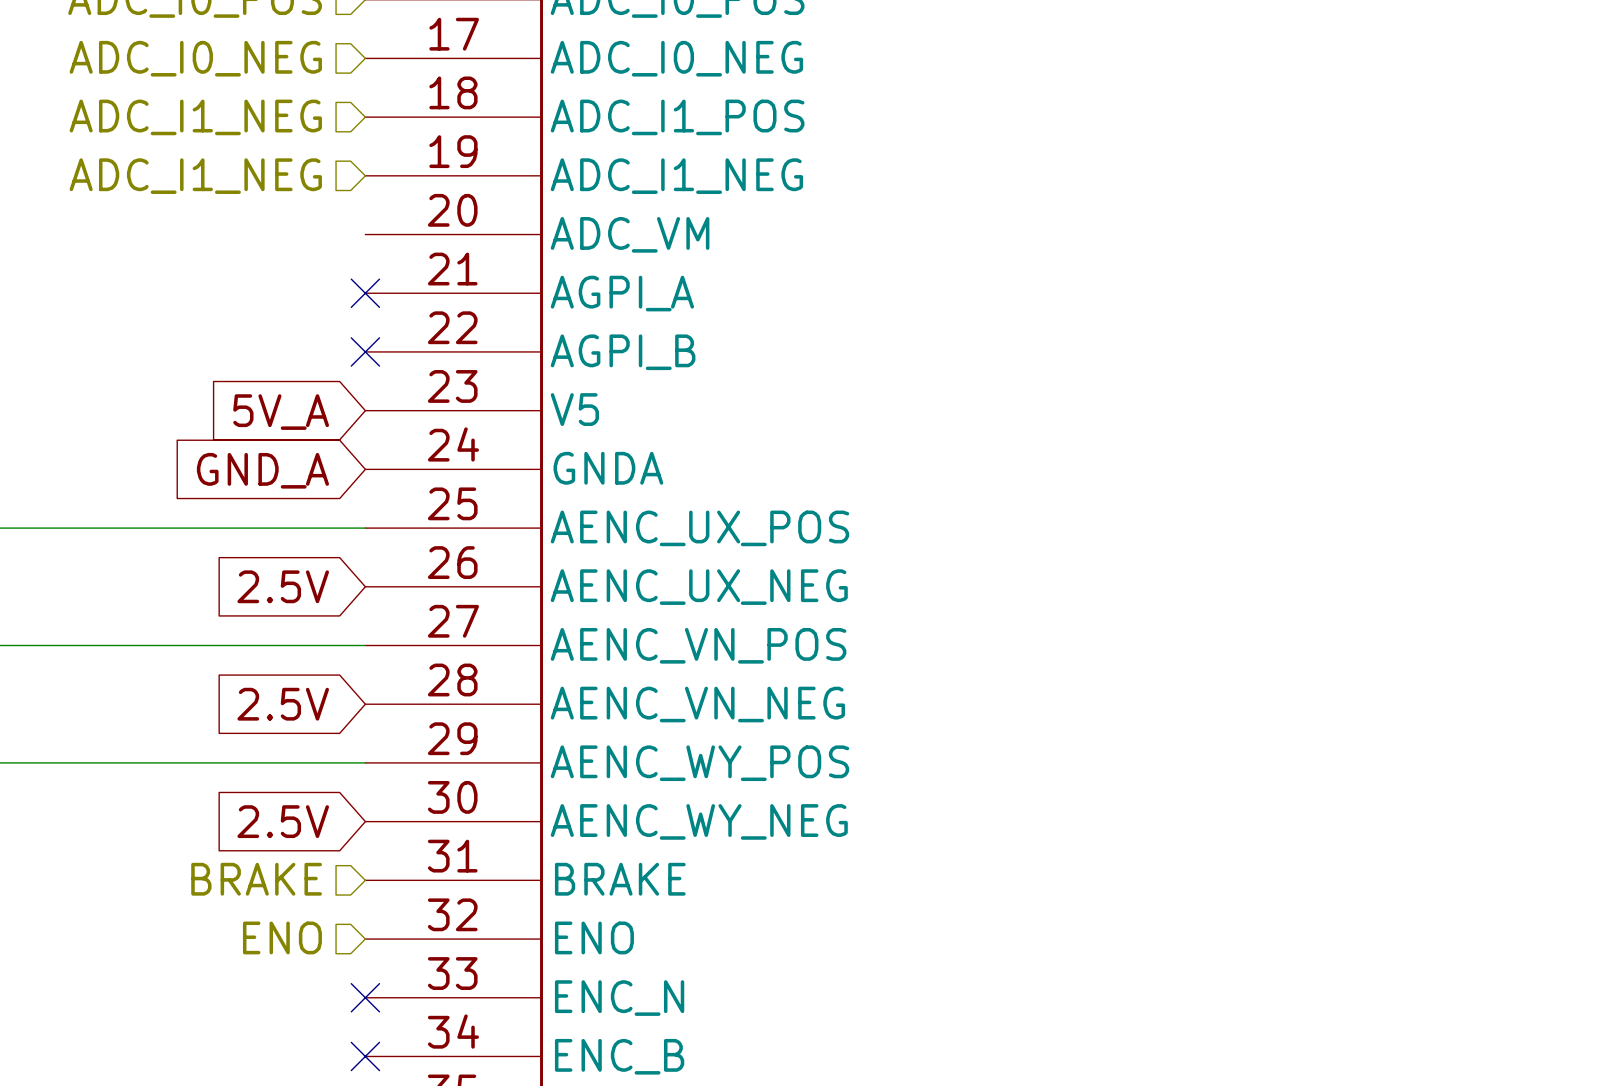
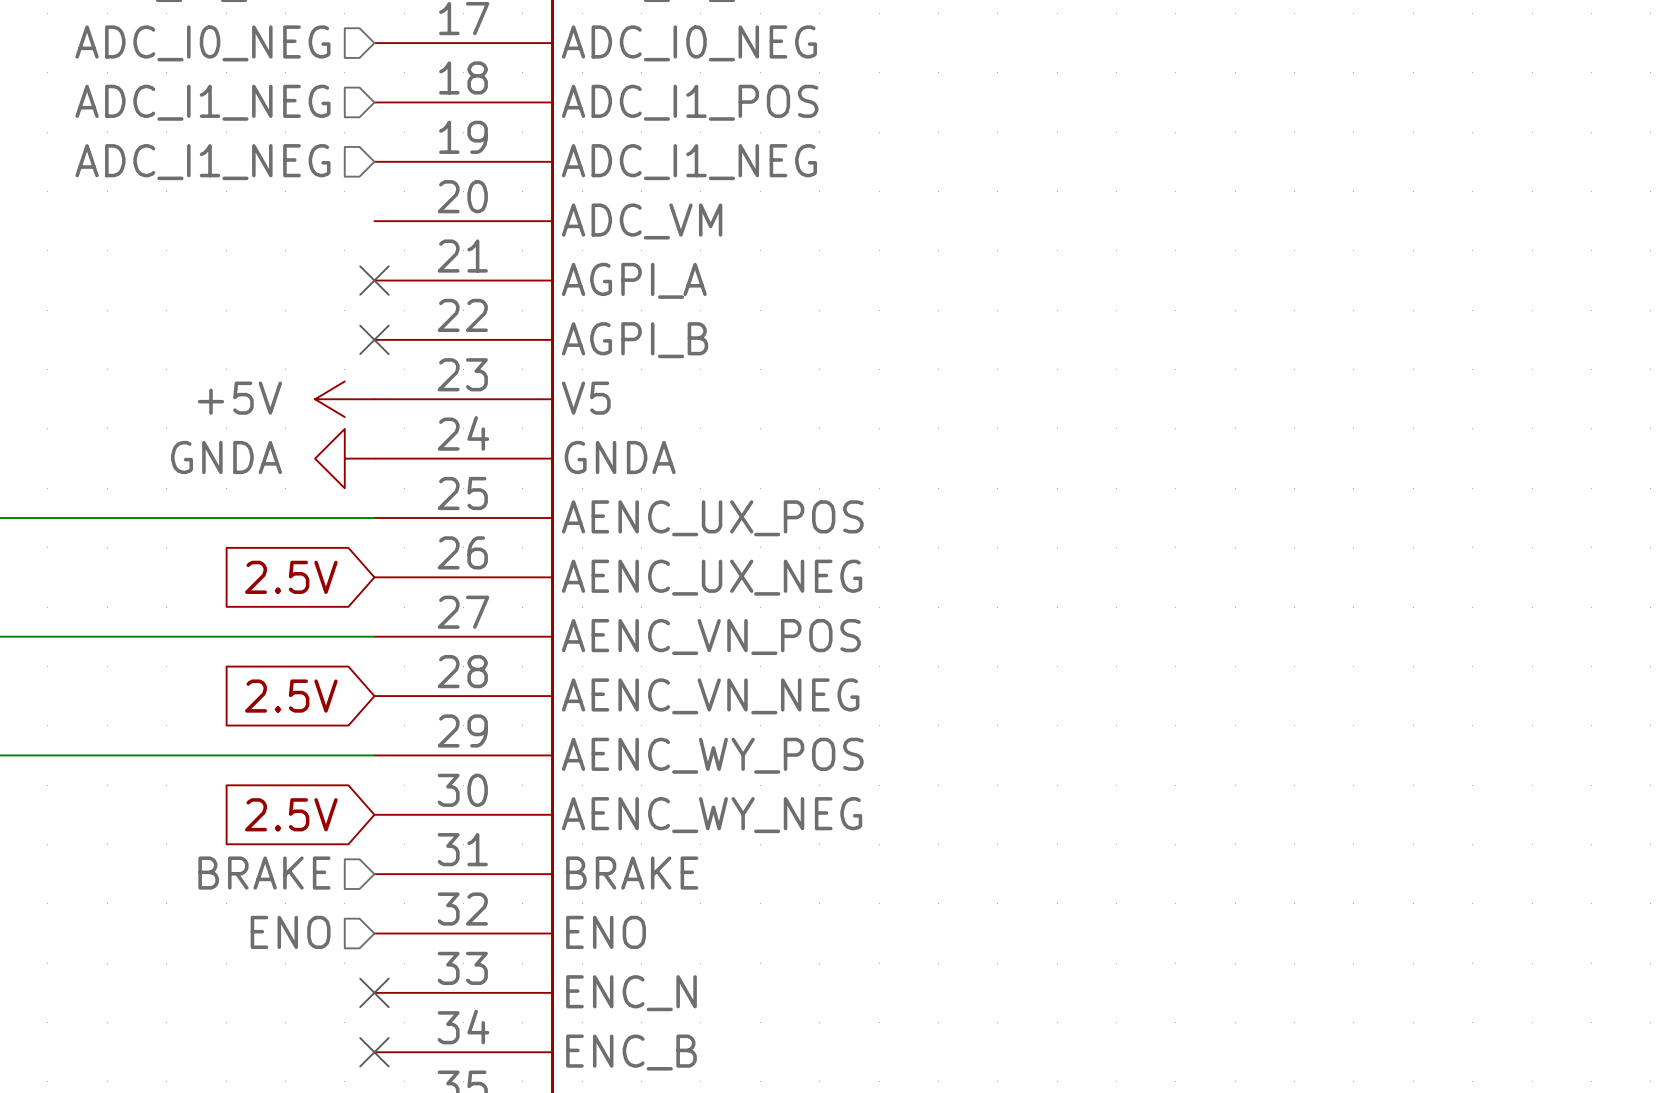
power symbol: none -> +5V (344, 399)
global label: 5V_A (281, 412) -> none
power symbol: none -> GNDA (344, 458)
global label: GND_A (262, 470) -> none

